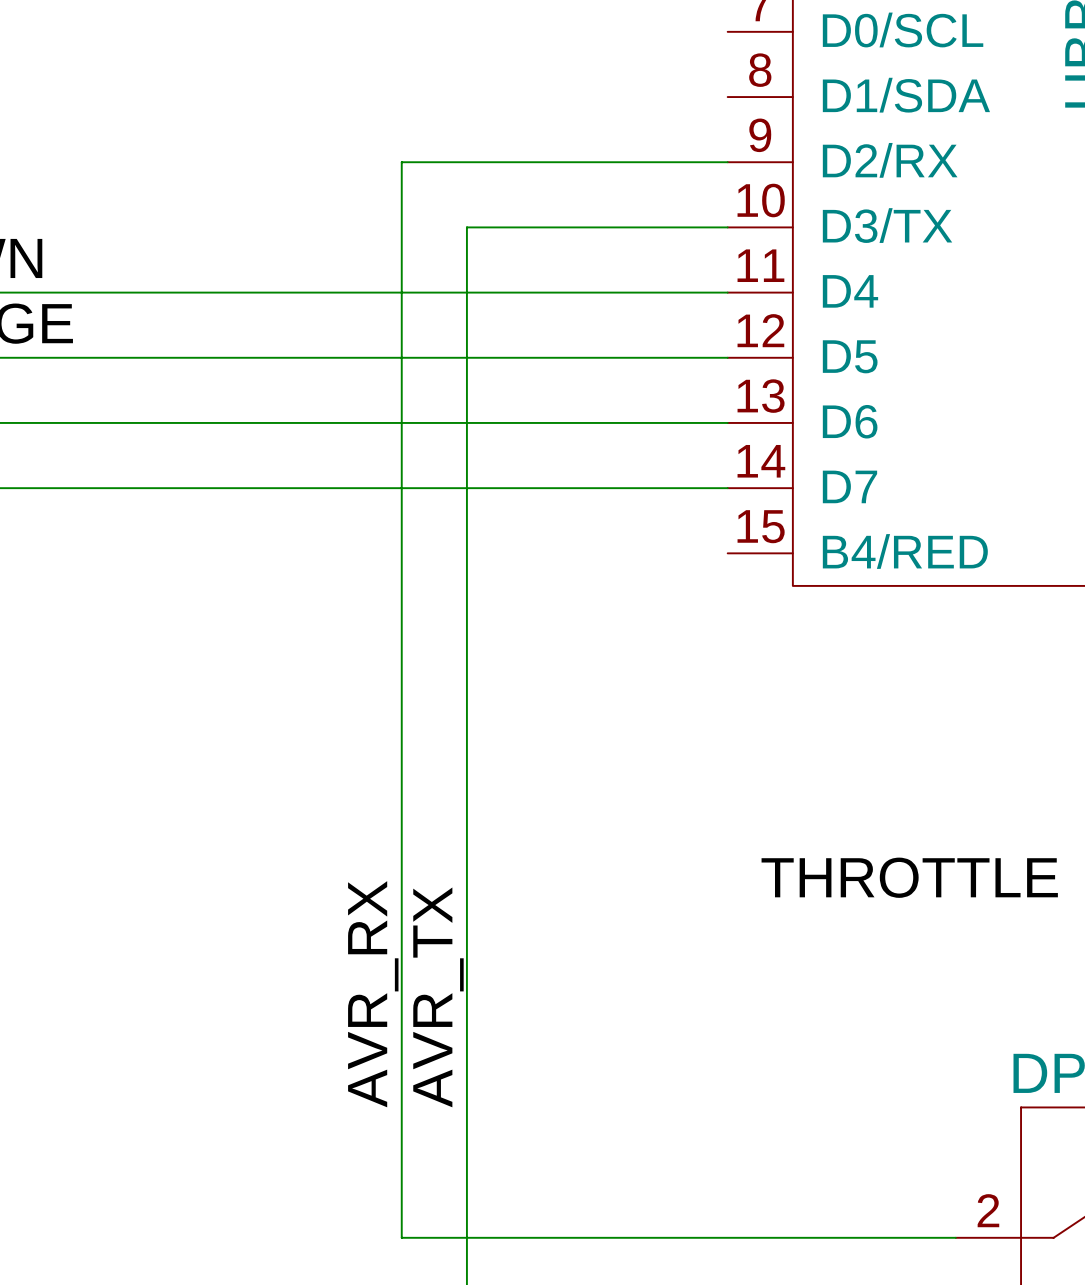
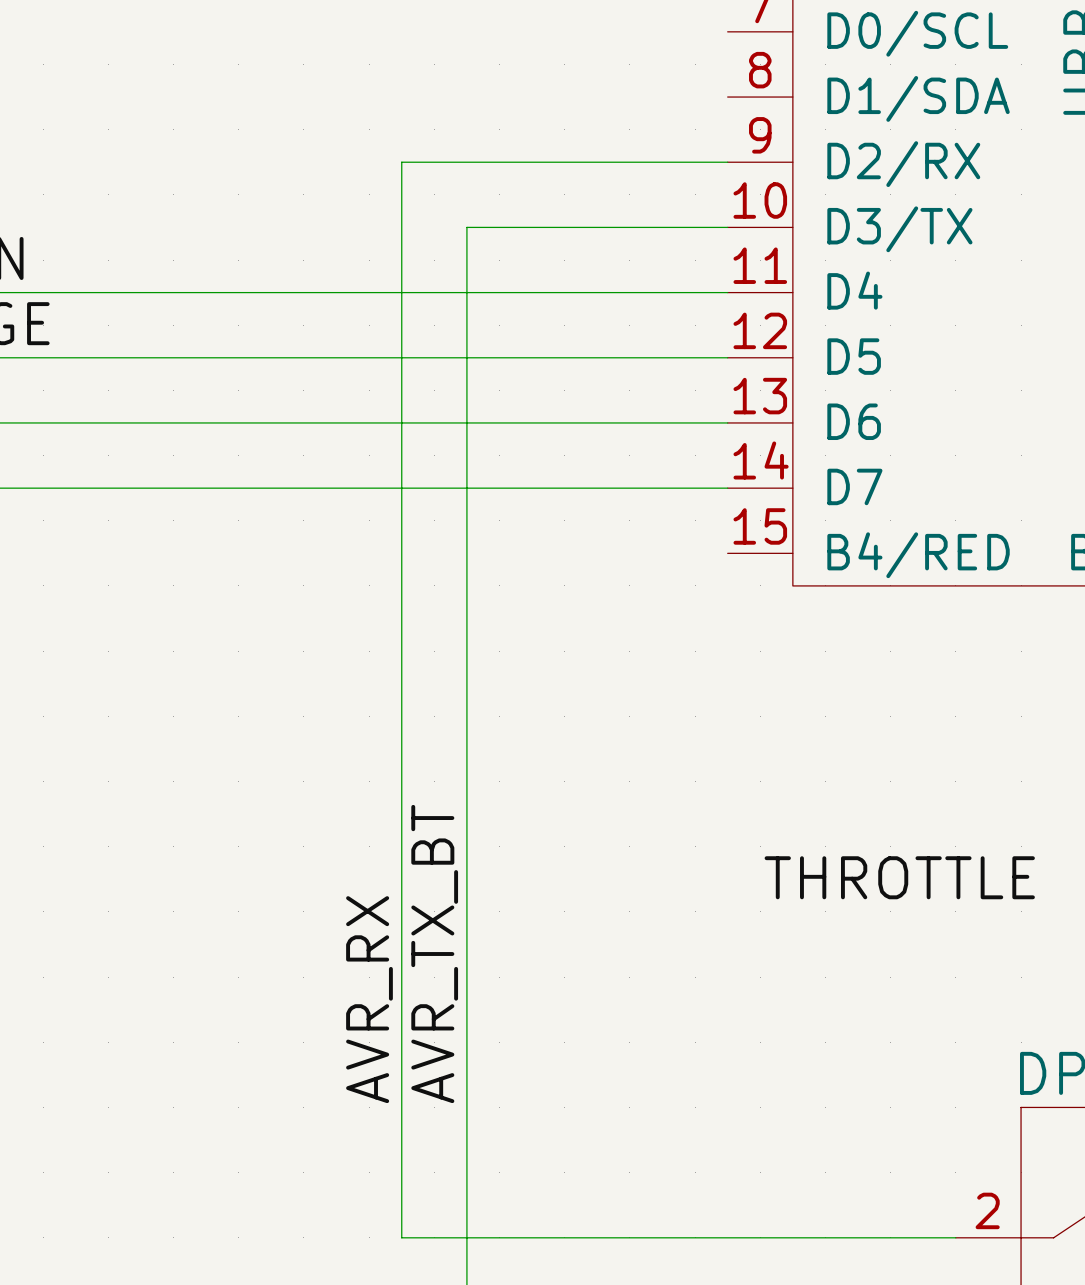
label: AVR_TX (438, 997) -> AVR_TX_BT (434, 954)

